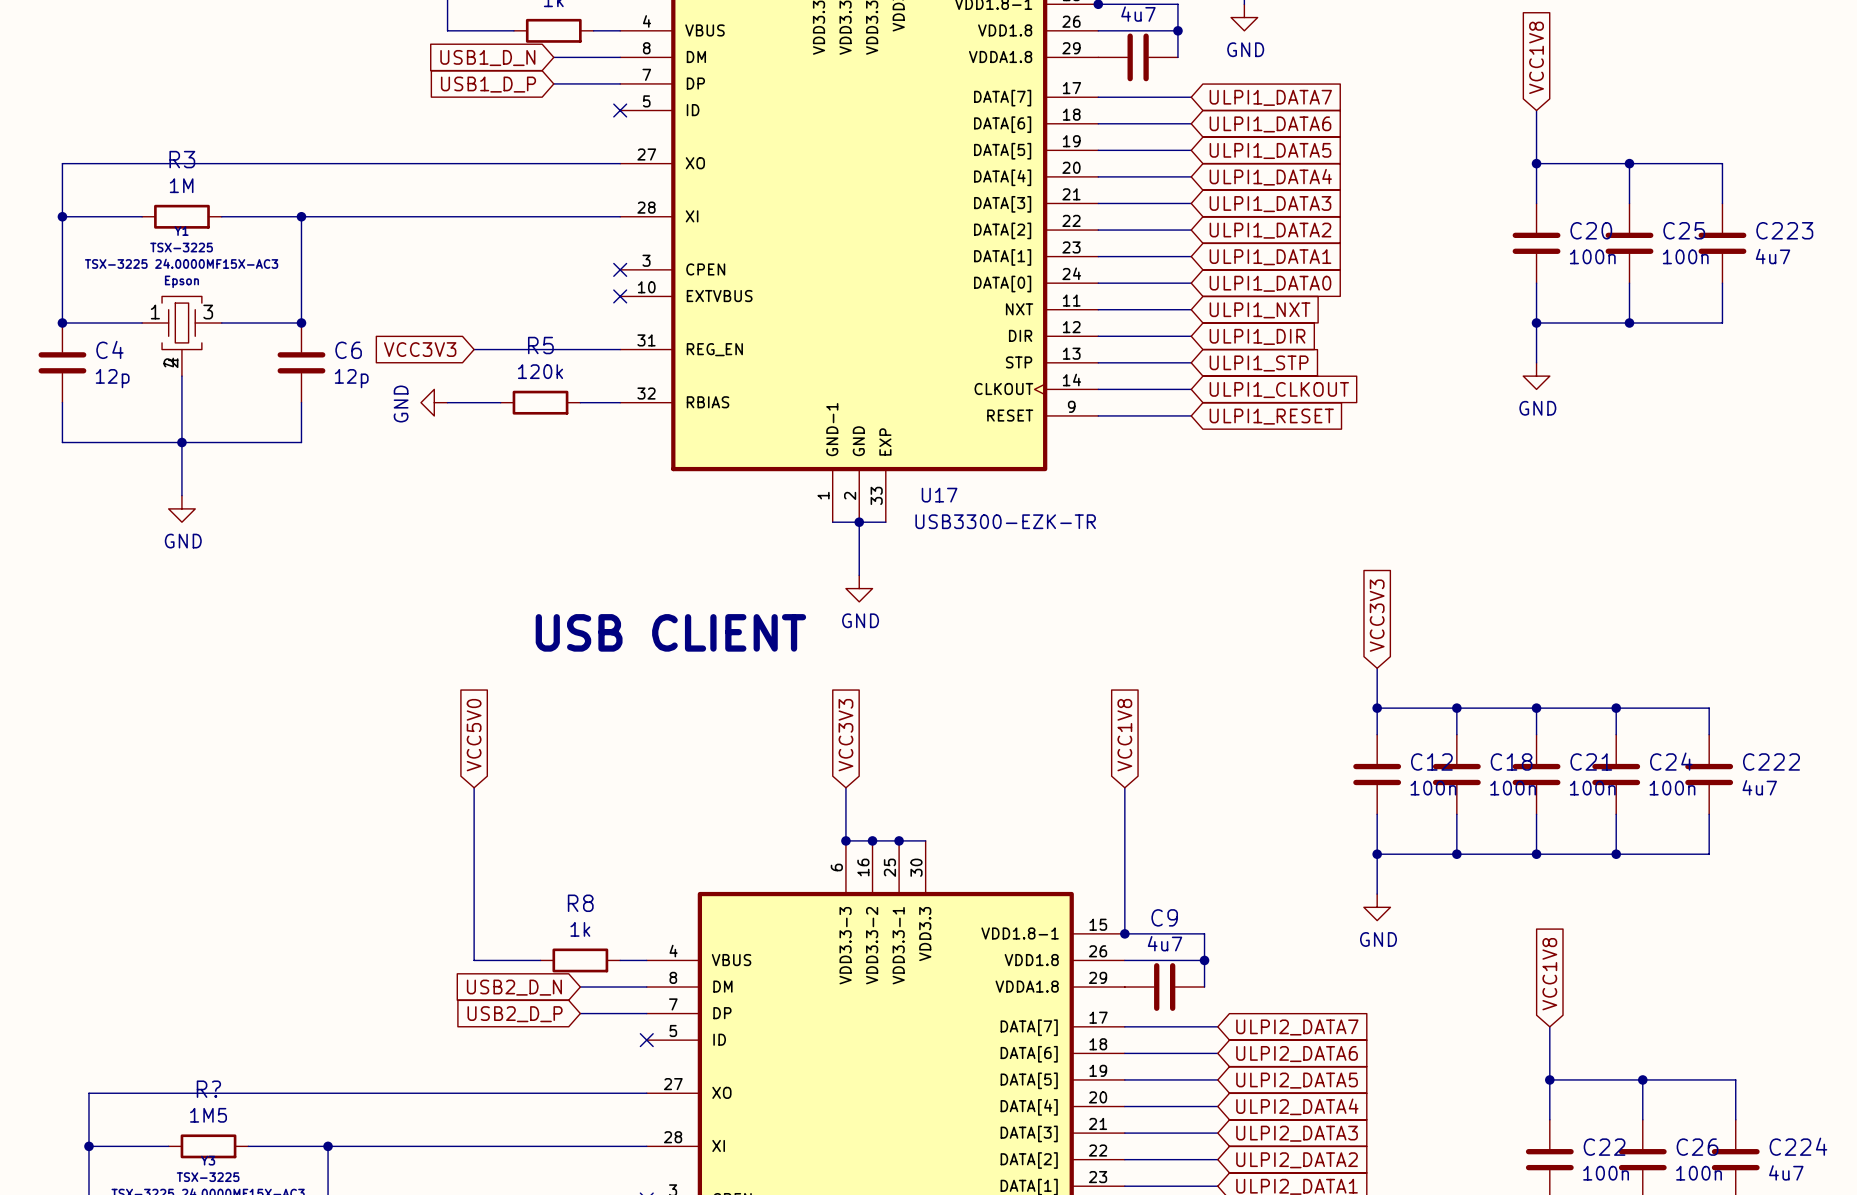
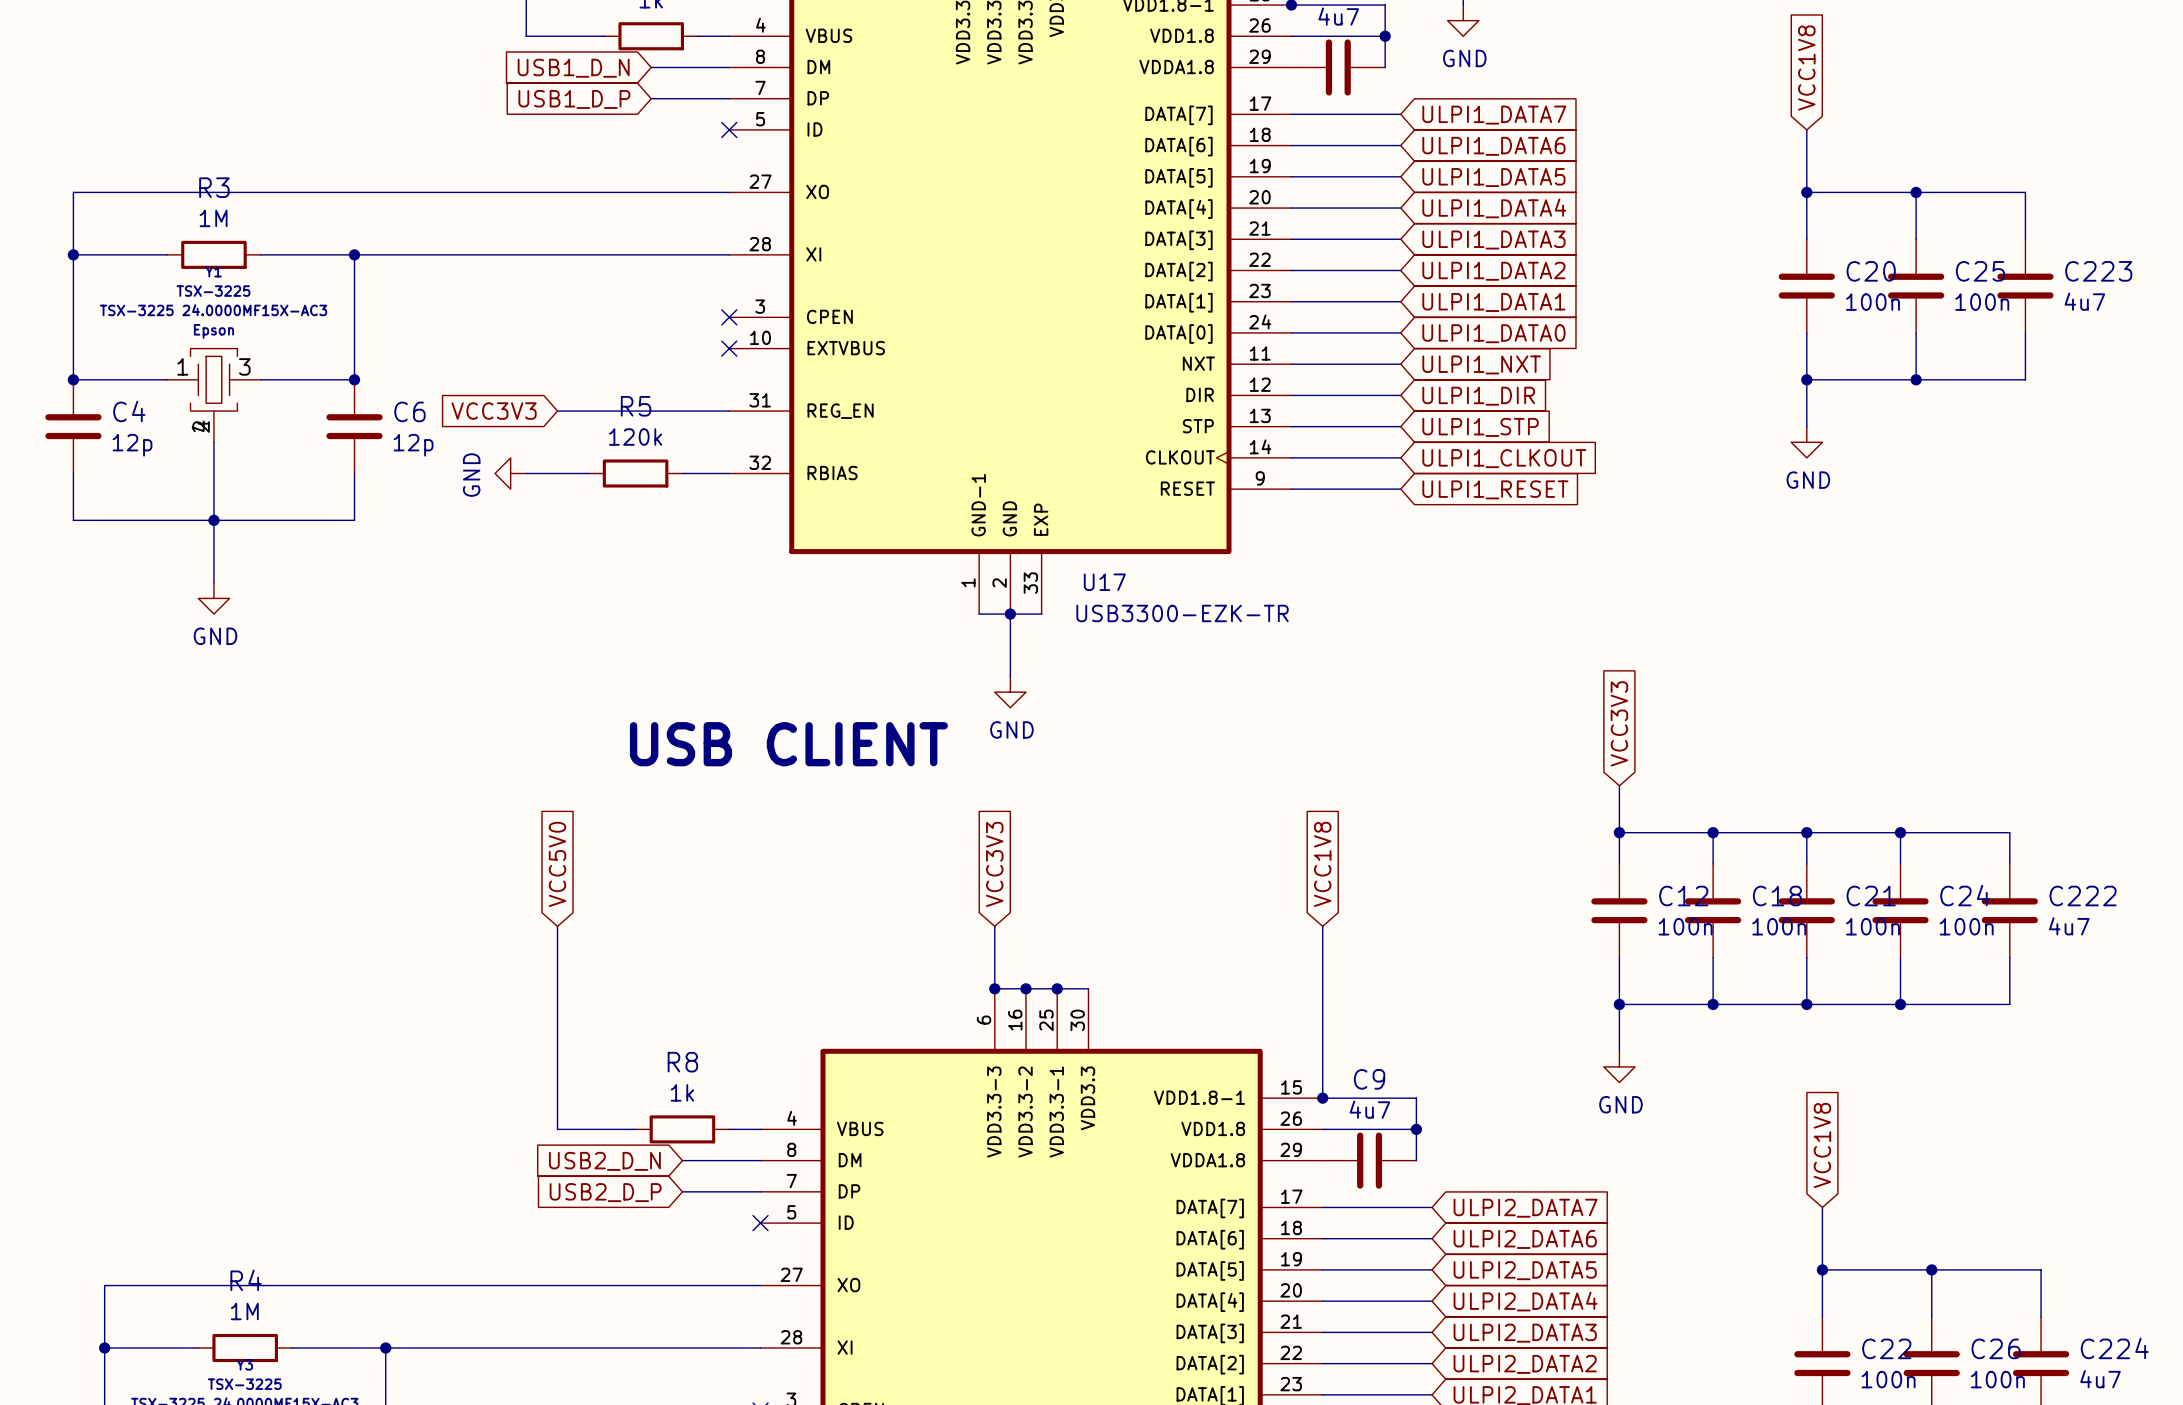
R? name: R? (208, 1089) -> R4 (246, 1280)
R? text: 1M5 (208, 1115) -> 1M (244, 1311)

